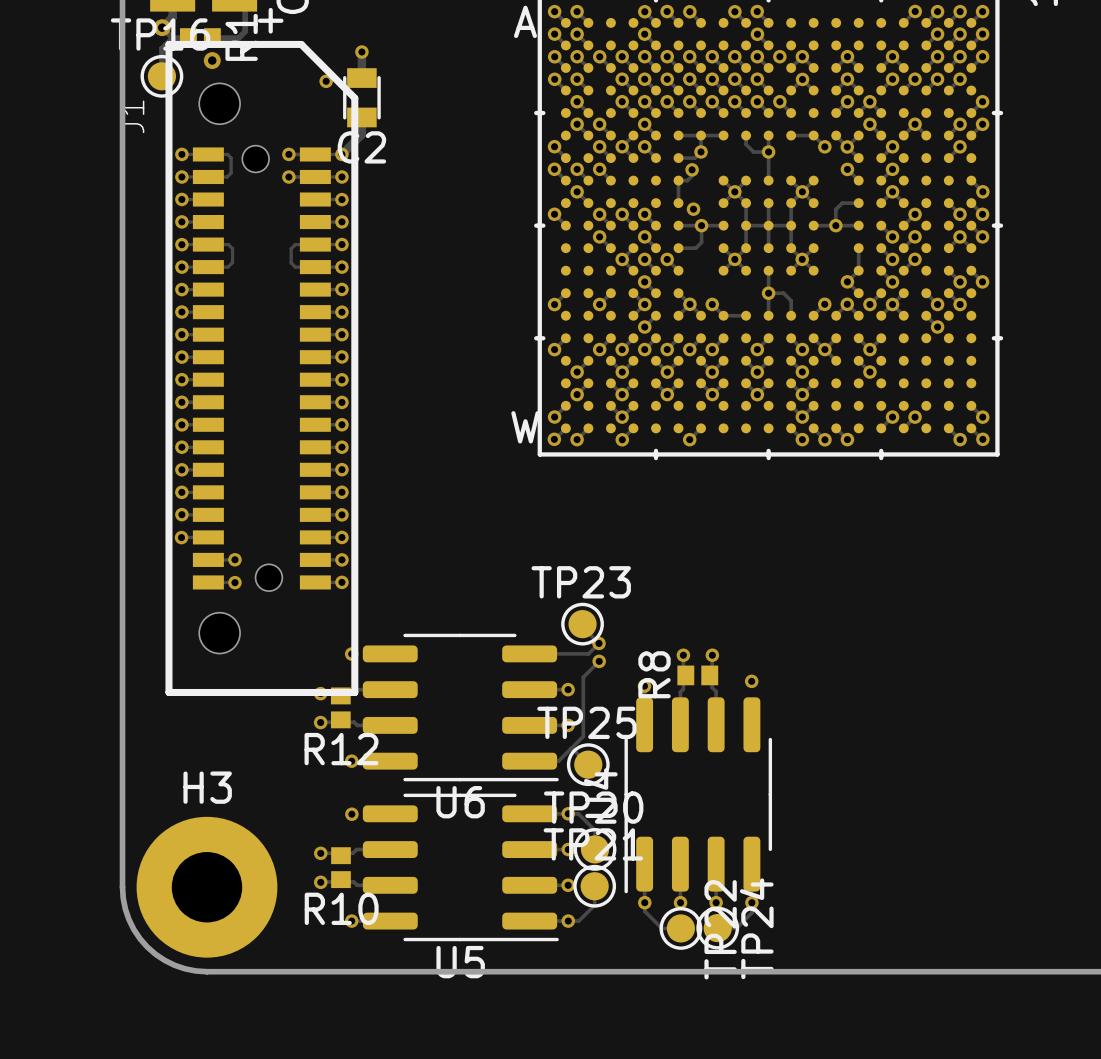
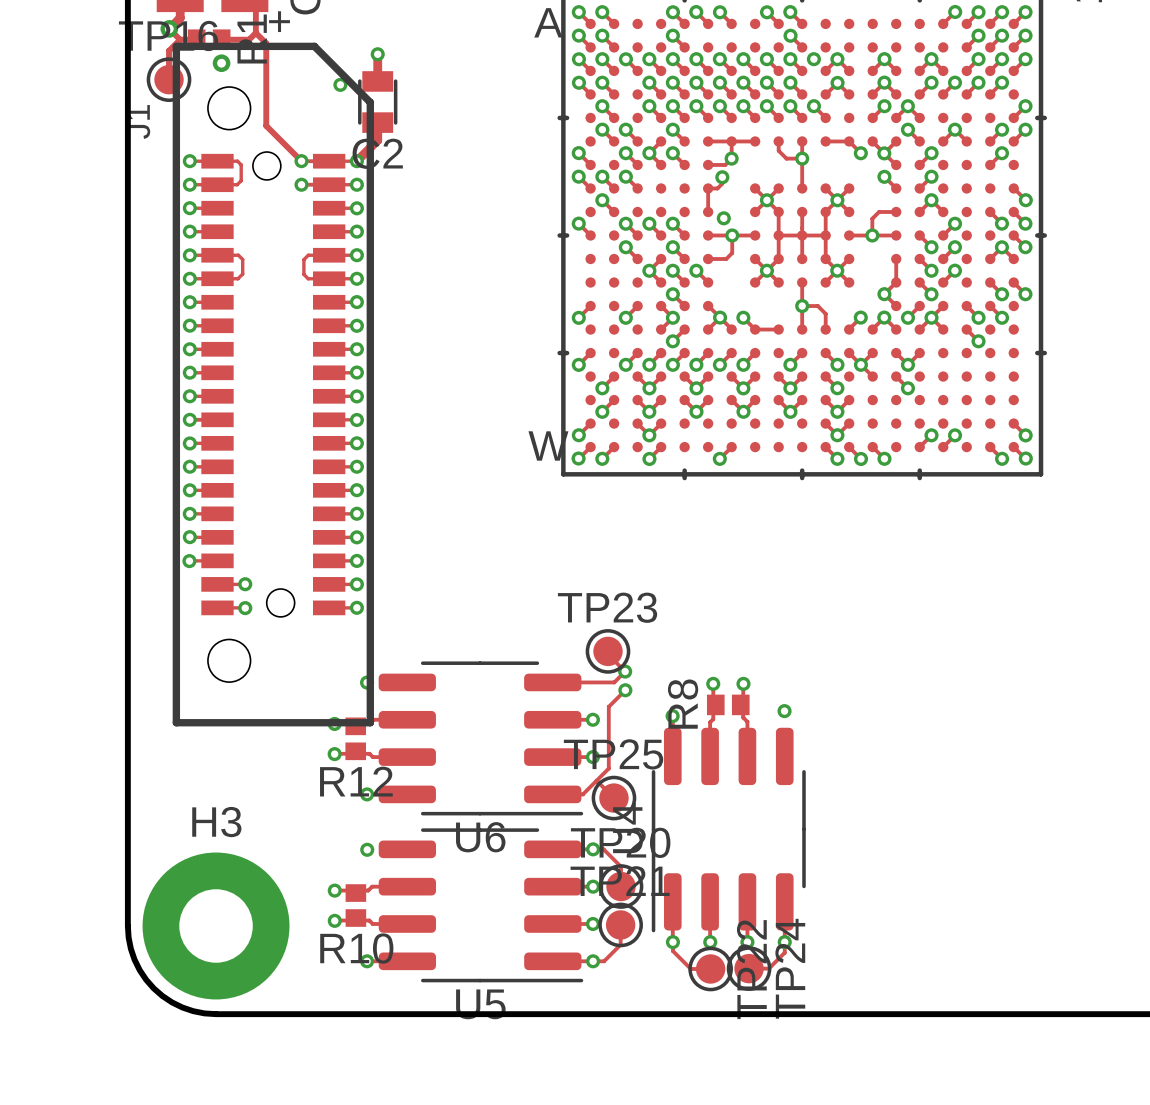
track: none -> (255, 32) (266, 43) (266, 125) (301, 161)

